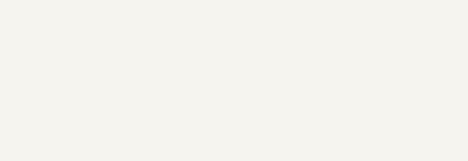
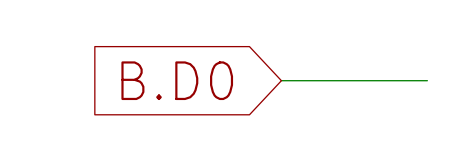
global label: none -> B.D0 (177, 80)
wire: none -> (281, 80) (427, 80)

